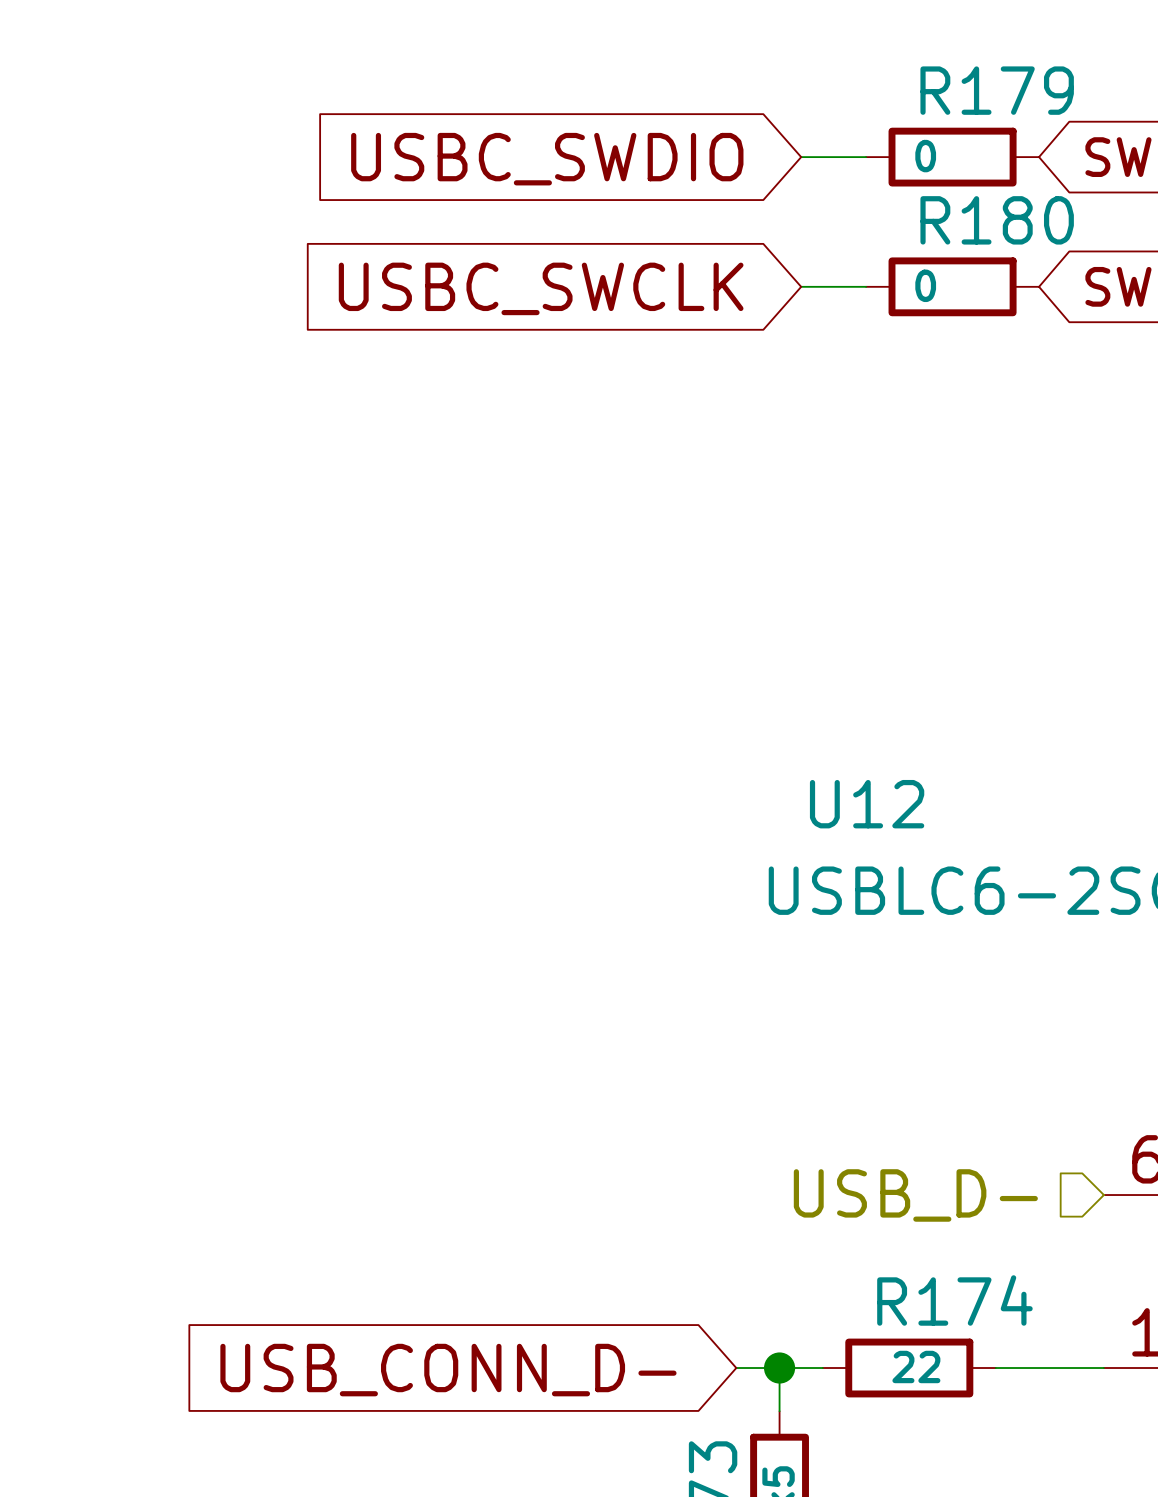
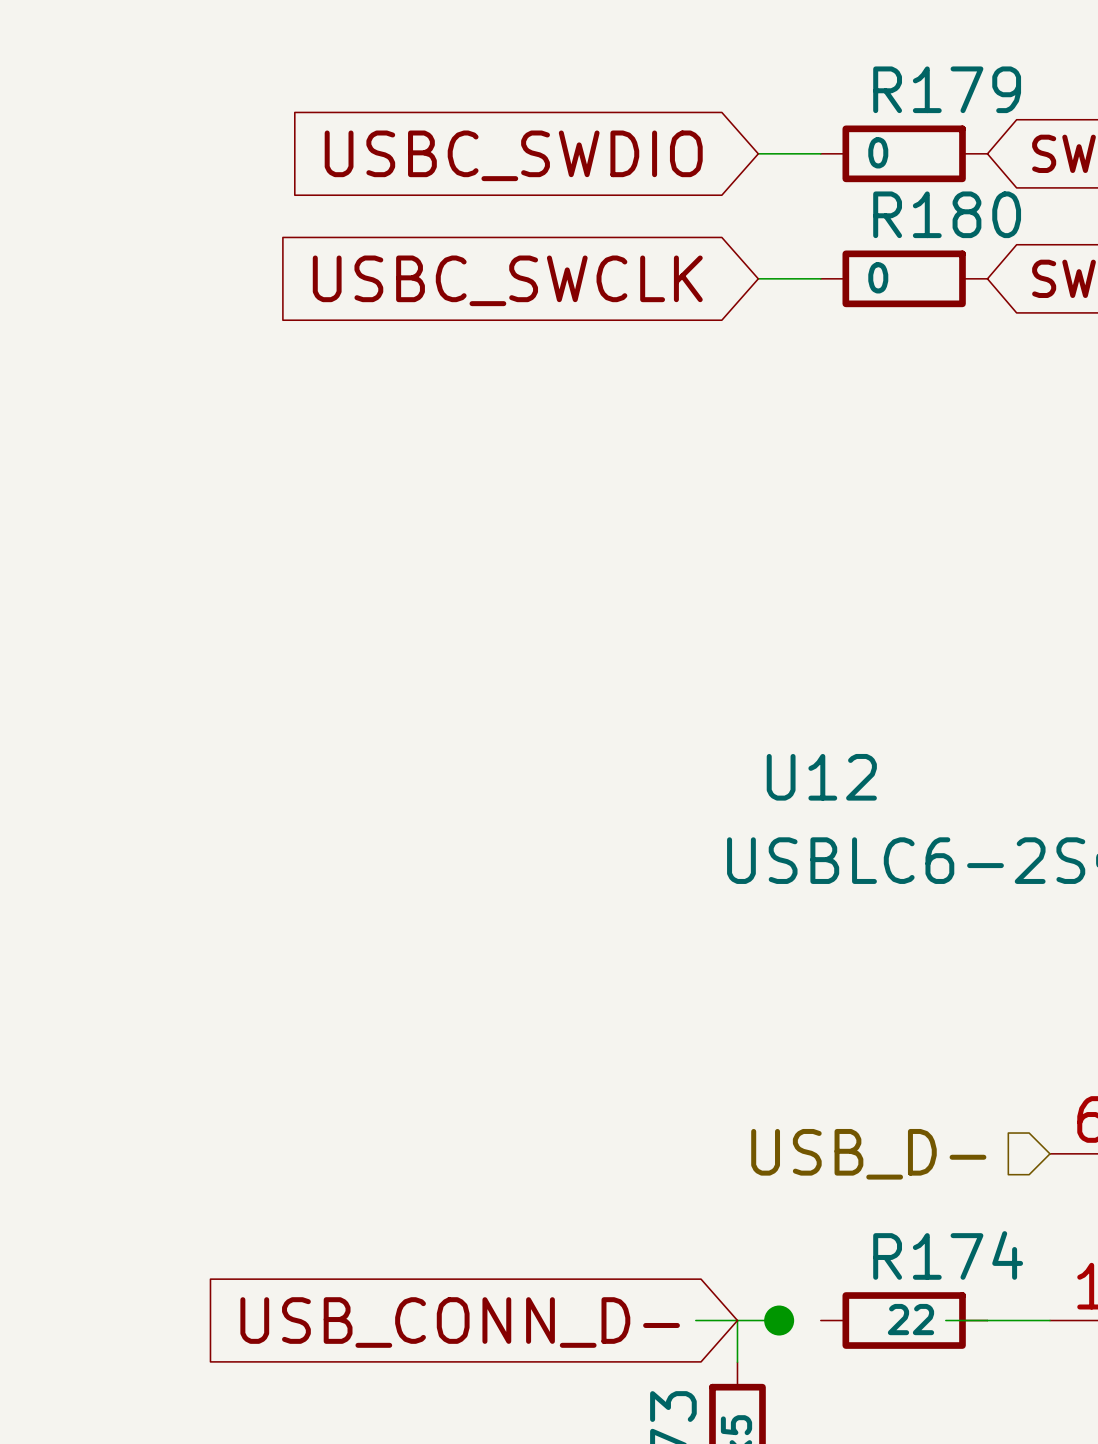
junction position: (779, 1368) -> (779, 1320)
R174 position: (909, 1368) -> (904, 1320)
global label position: USB_CONN_D- (448, 1370) -> USB_CONN_D- (460, 1322)

